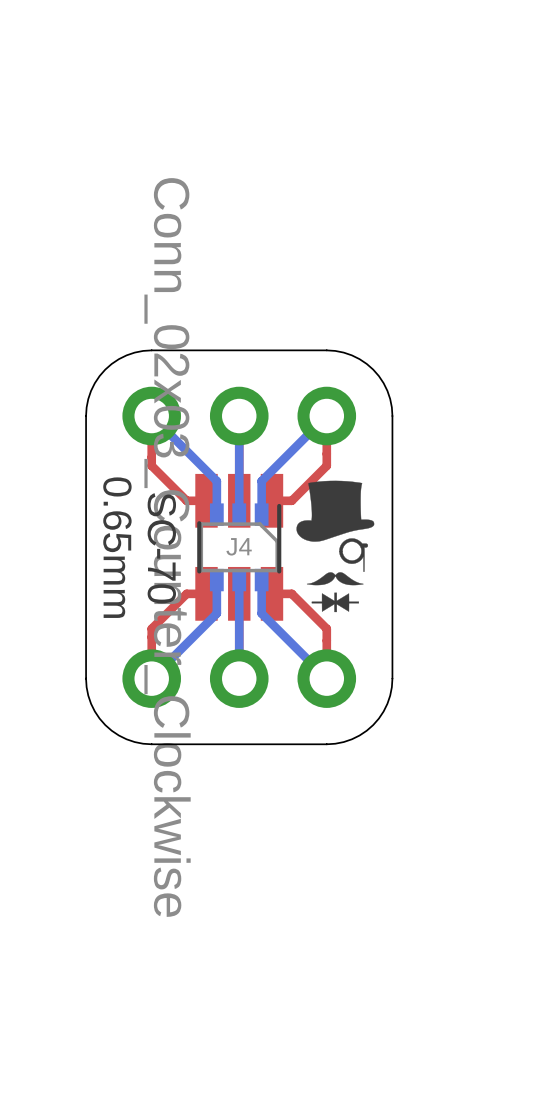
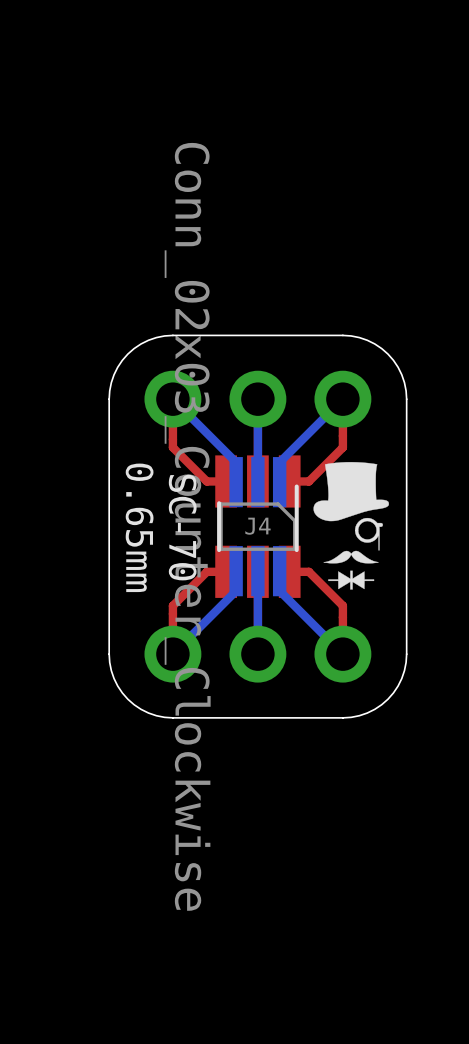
J4 footprint: [197, 503, 282, 592] -> [217, 457, 299, 597]

